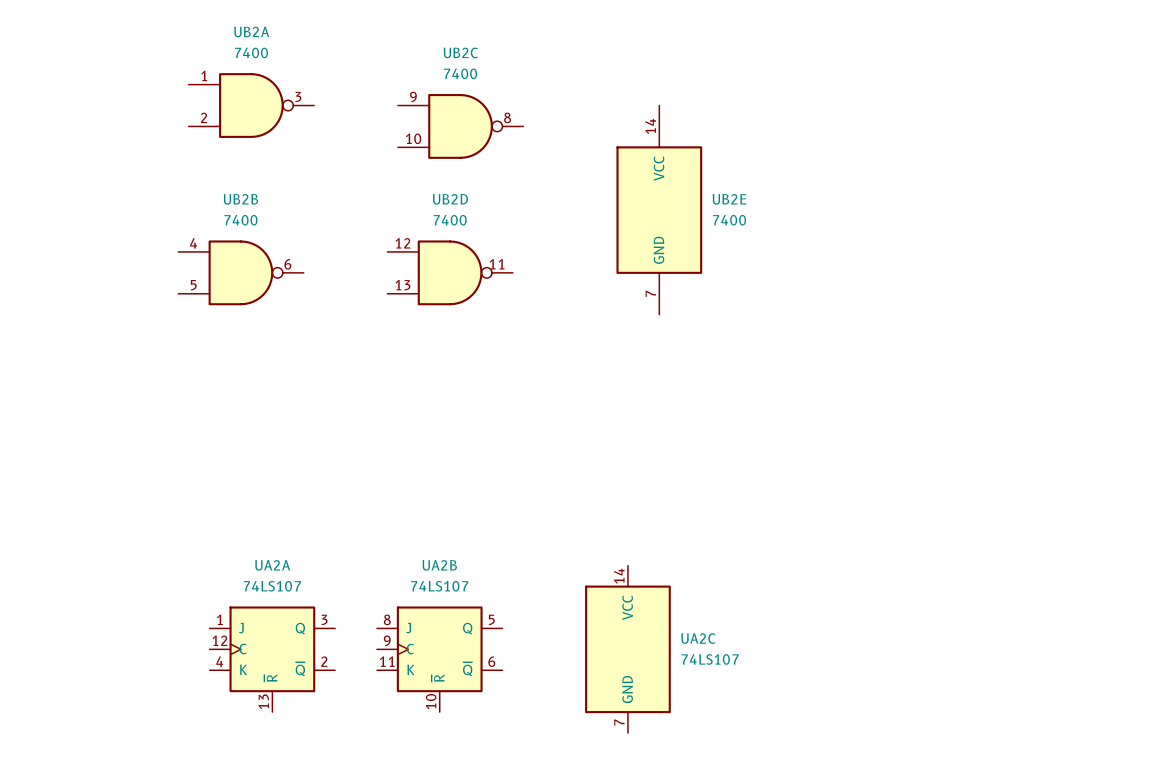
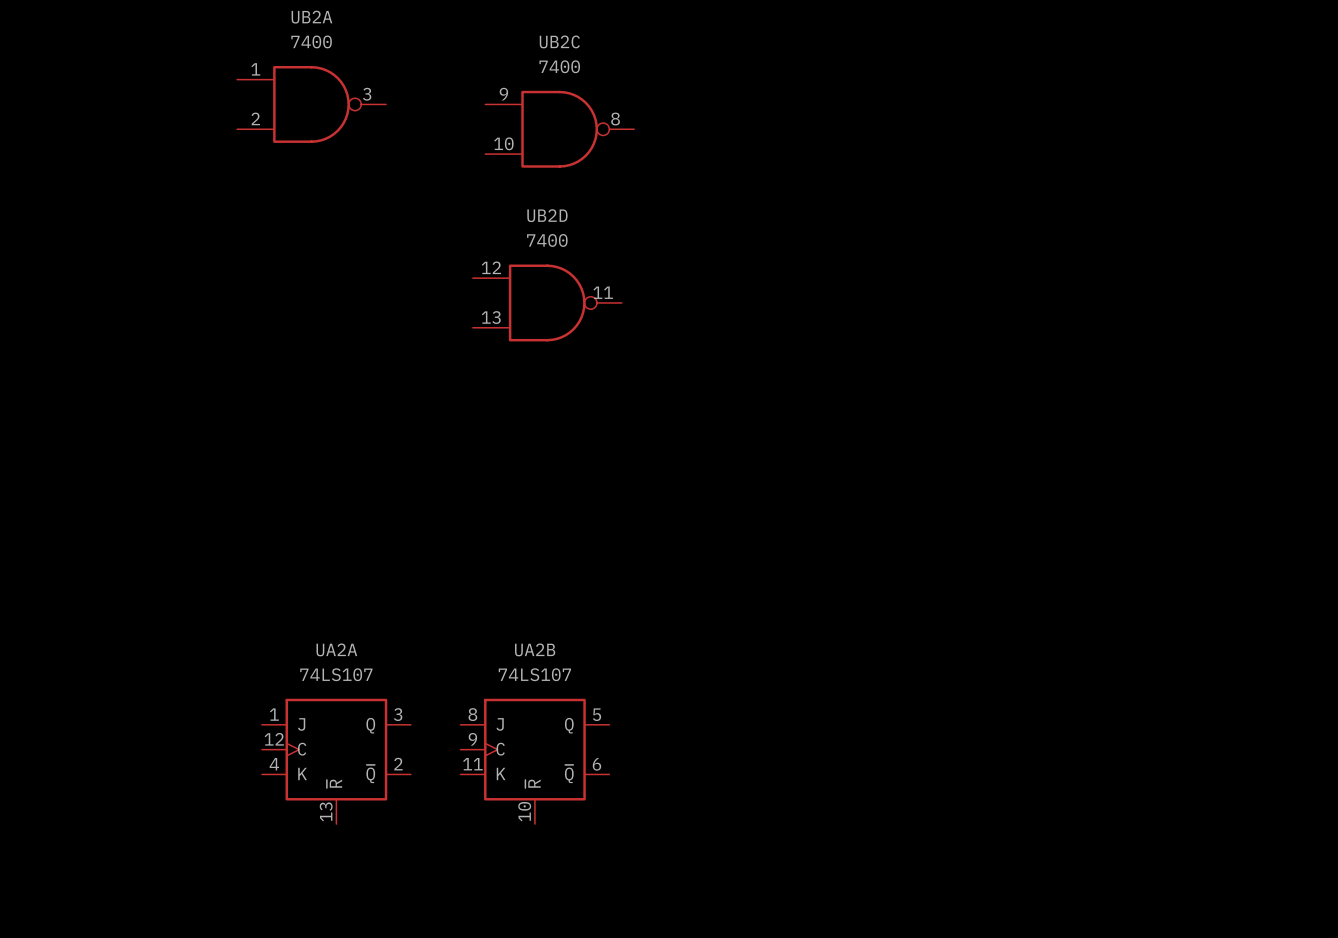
UB2E: 7400 (659, 210) -> none
UB2B: 7400 (241, 272) -> none
UA2C: 74LS107 (627, 649) -> none

